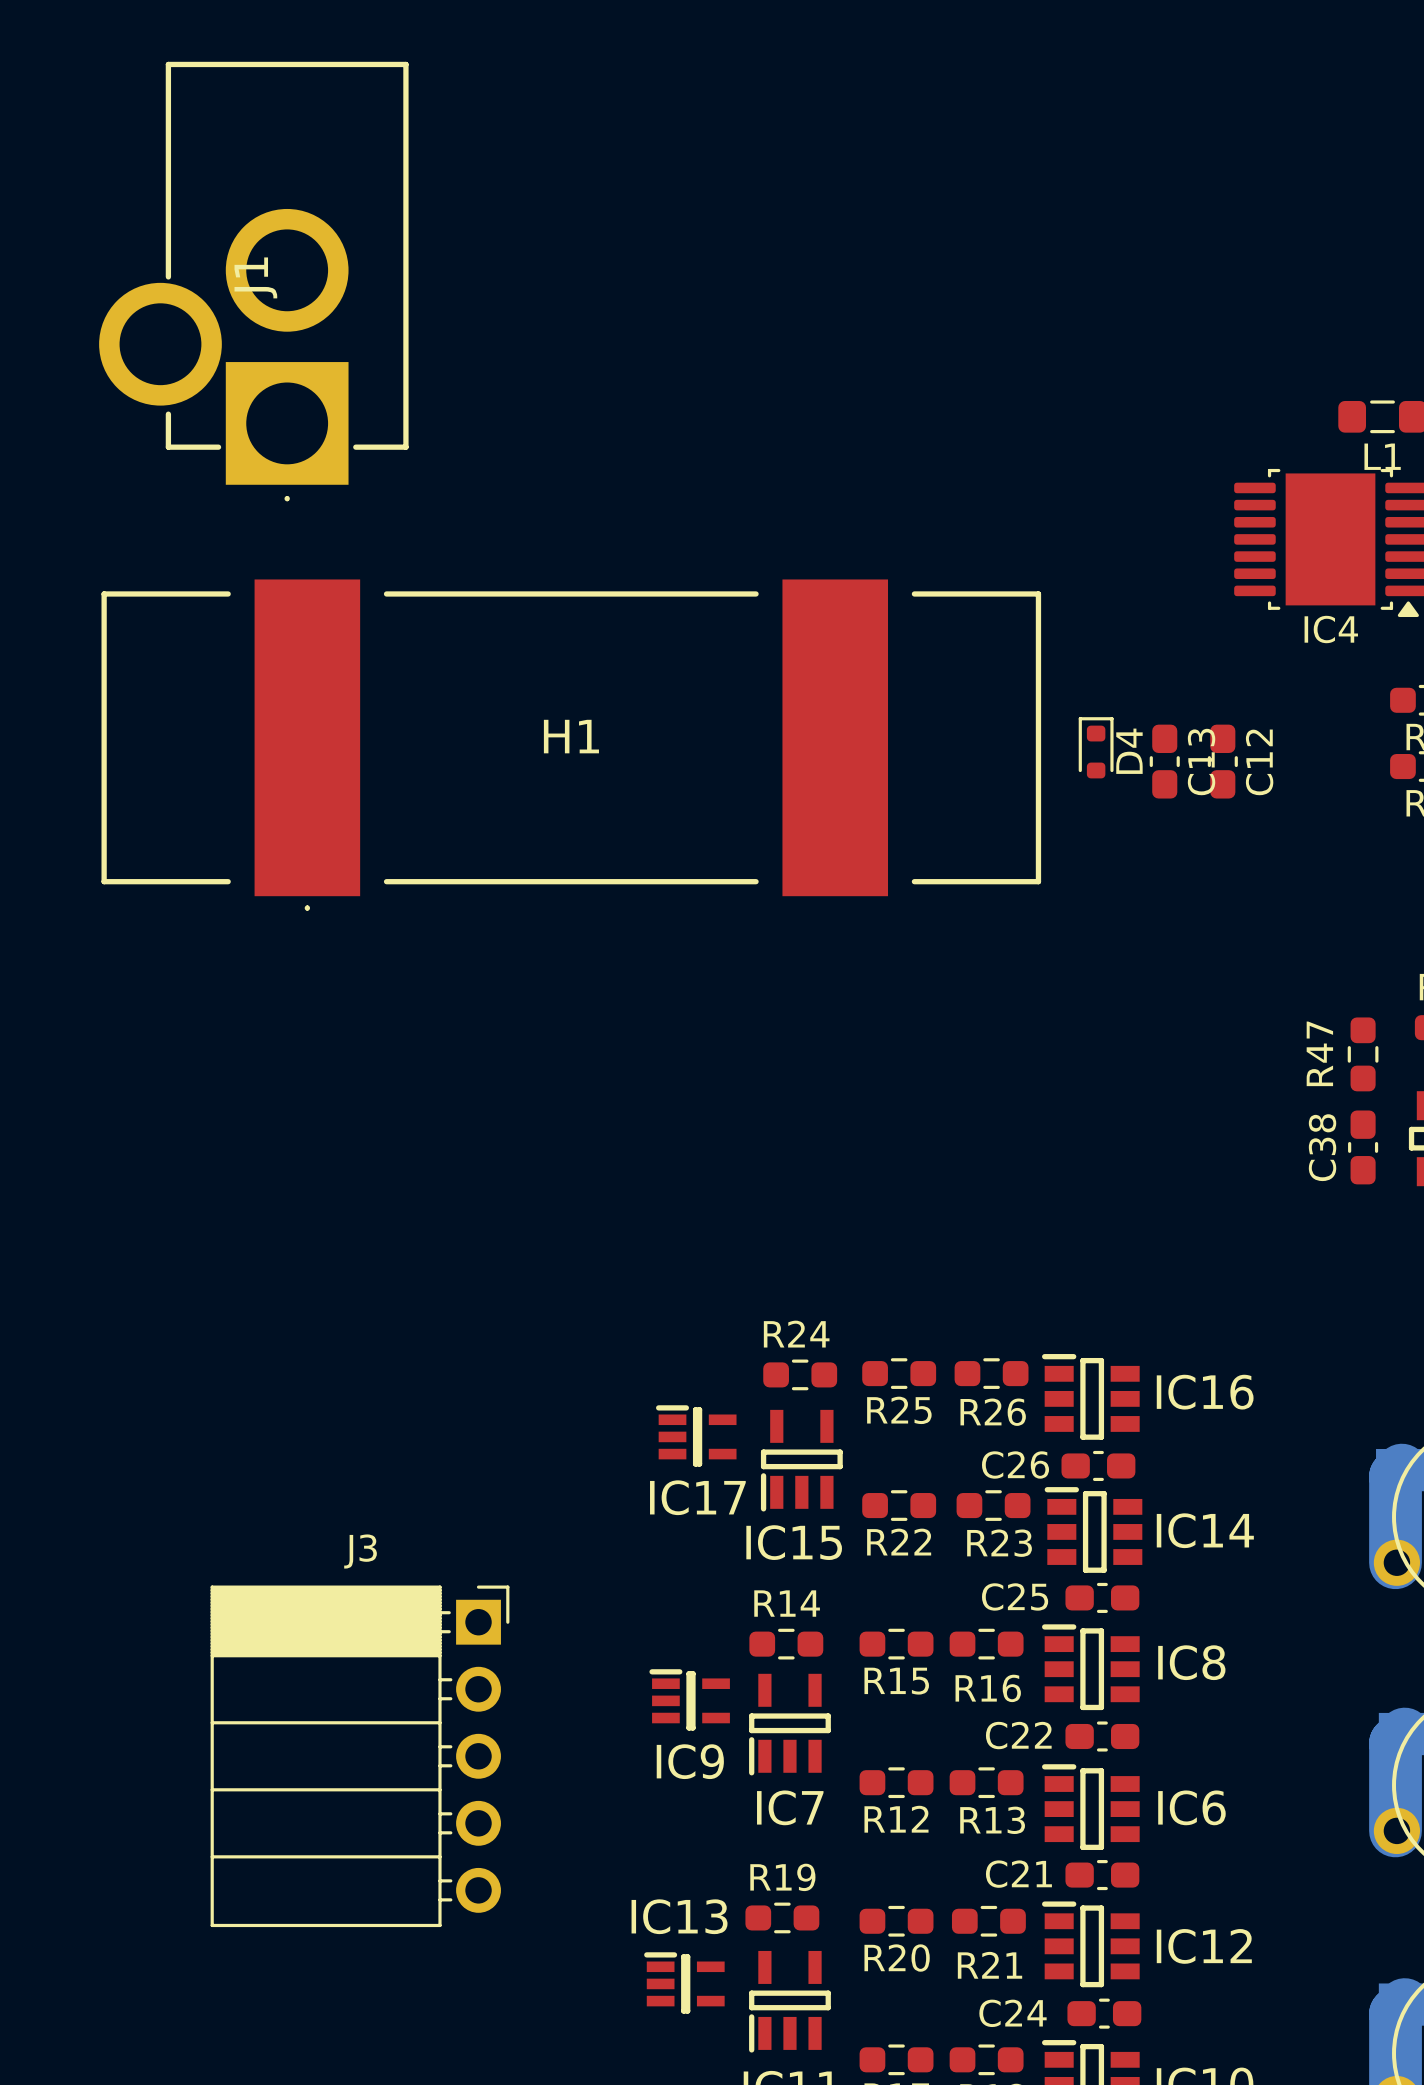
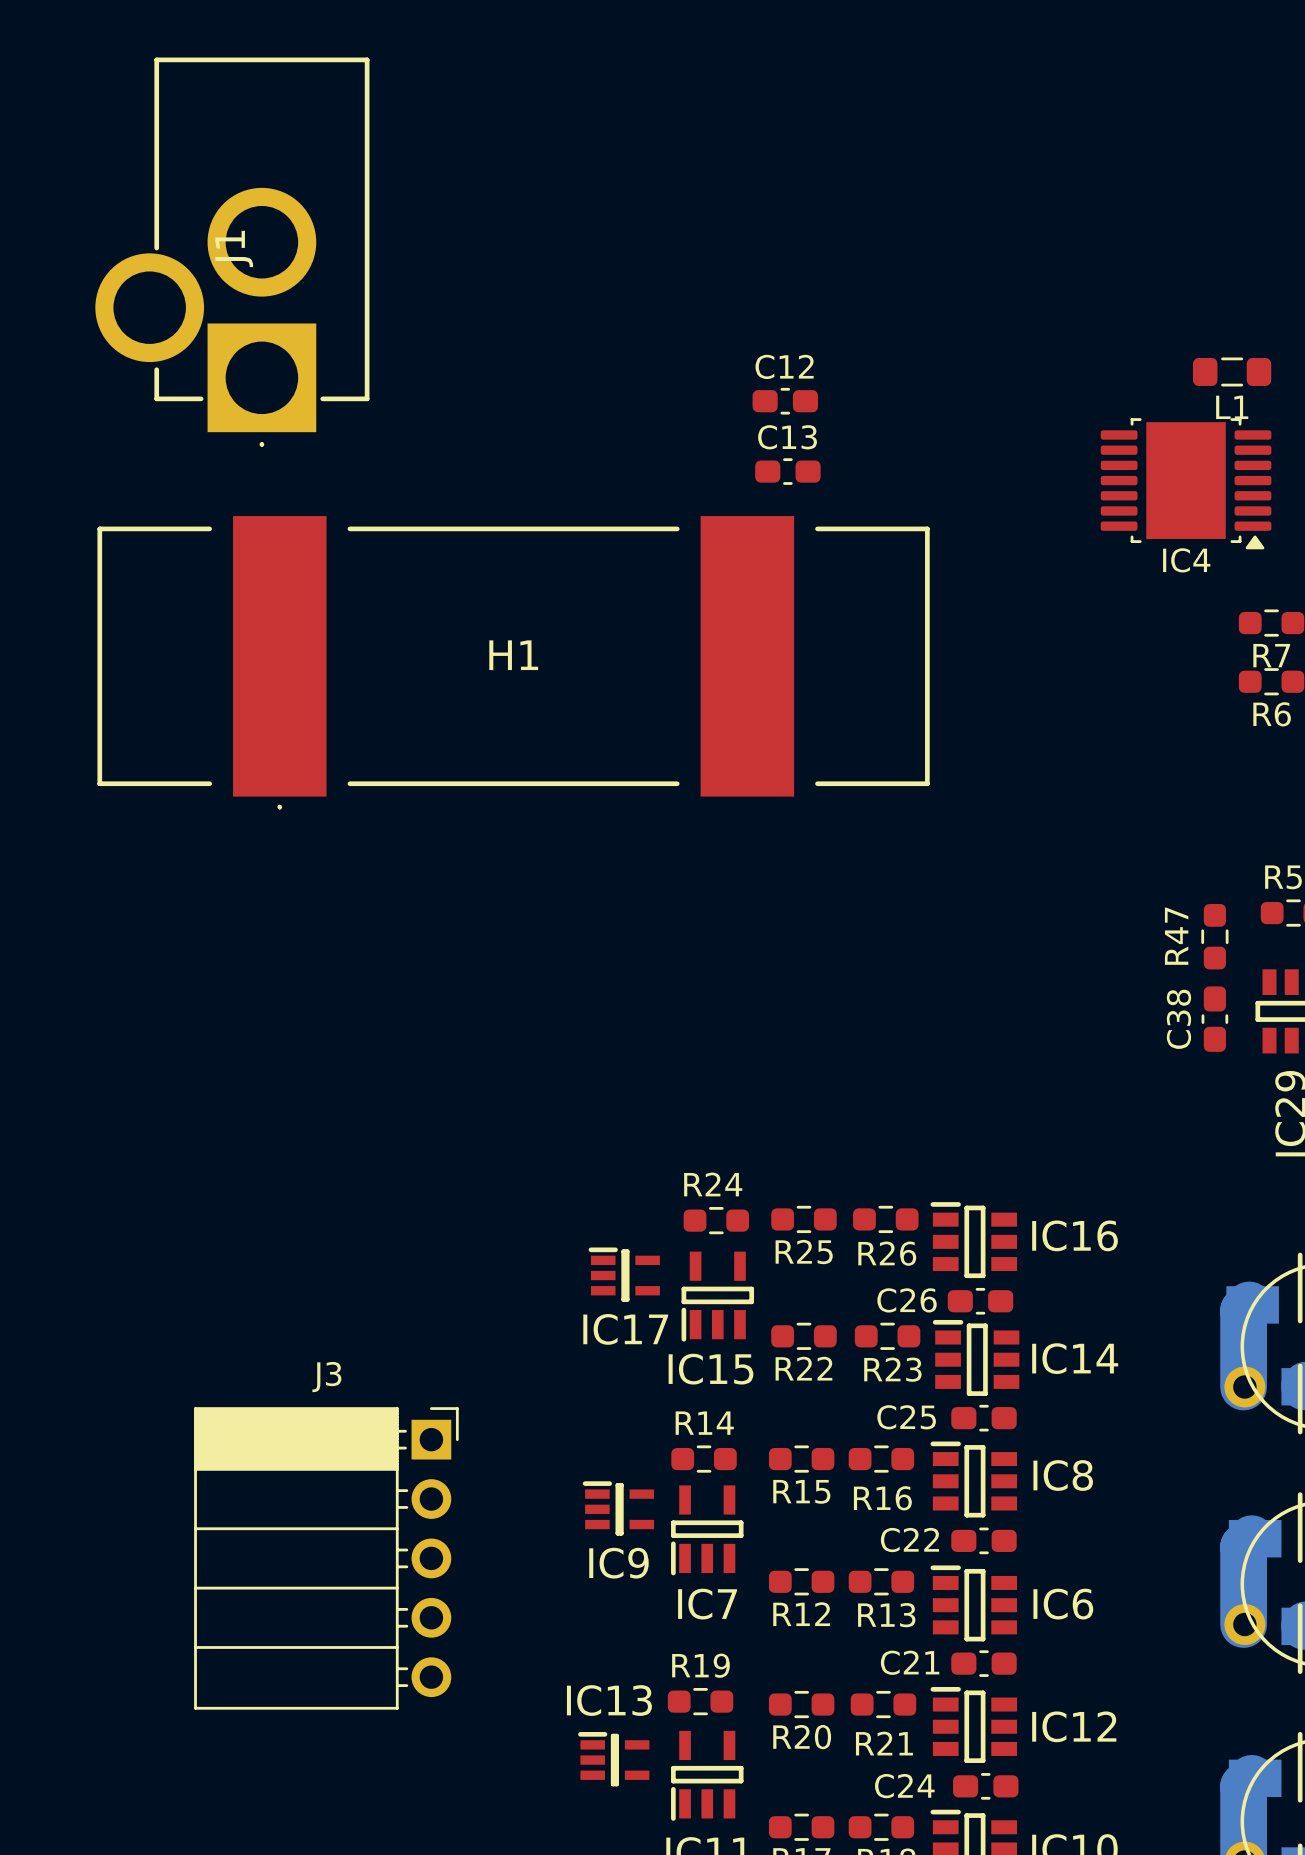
D4: (1096, 747) -> none
C13 rotation: 0° (1164, 761) -> 90° clockwise (787, 471)
C13 position: (1164, 761) -> (787, 471)
C12 rotation: 0° (1222, 761) -> 90° clockwise (785, 401)
C12 position: (1222, 761) -> (785, 401)
C13 name position: C13 (1201, 762) -> C13 (787, 437)
C12 name position: C12 (1259, 762) -> C12 (784, 366)

